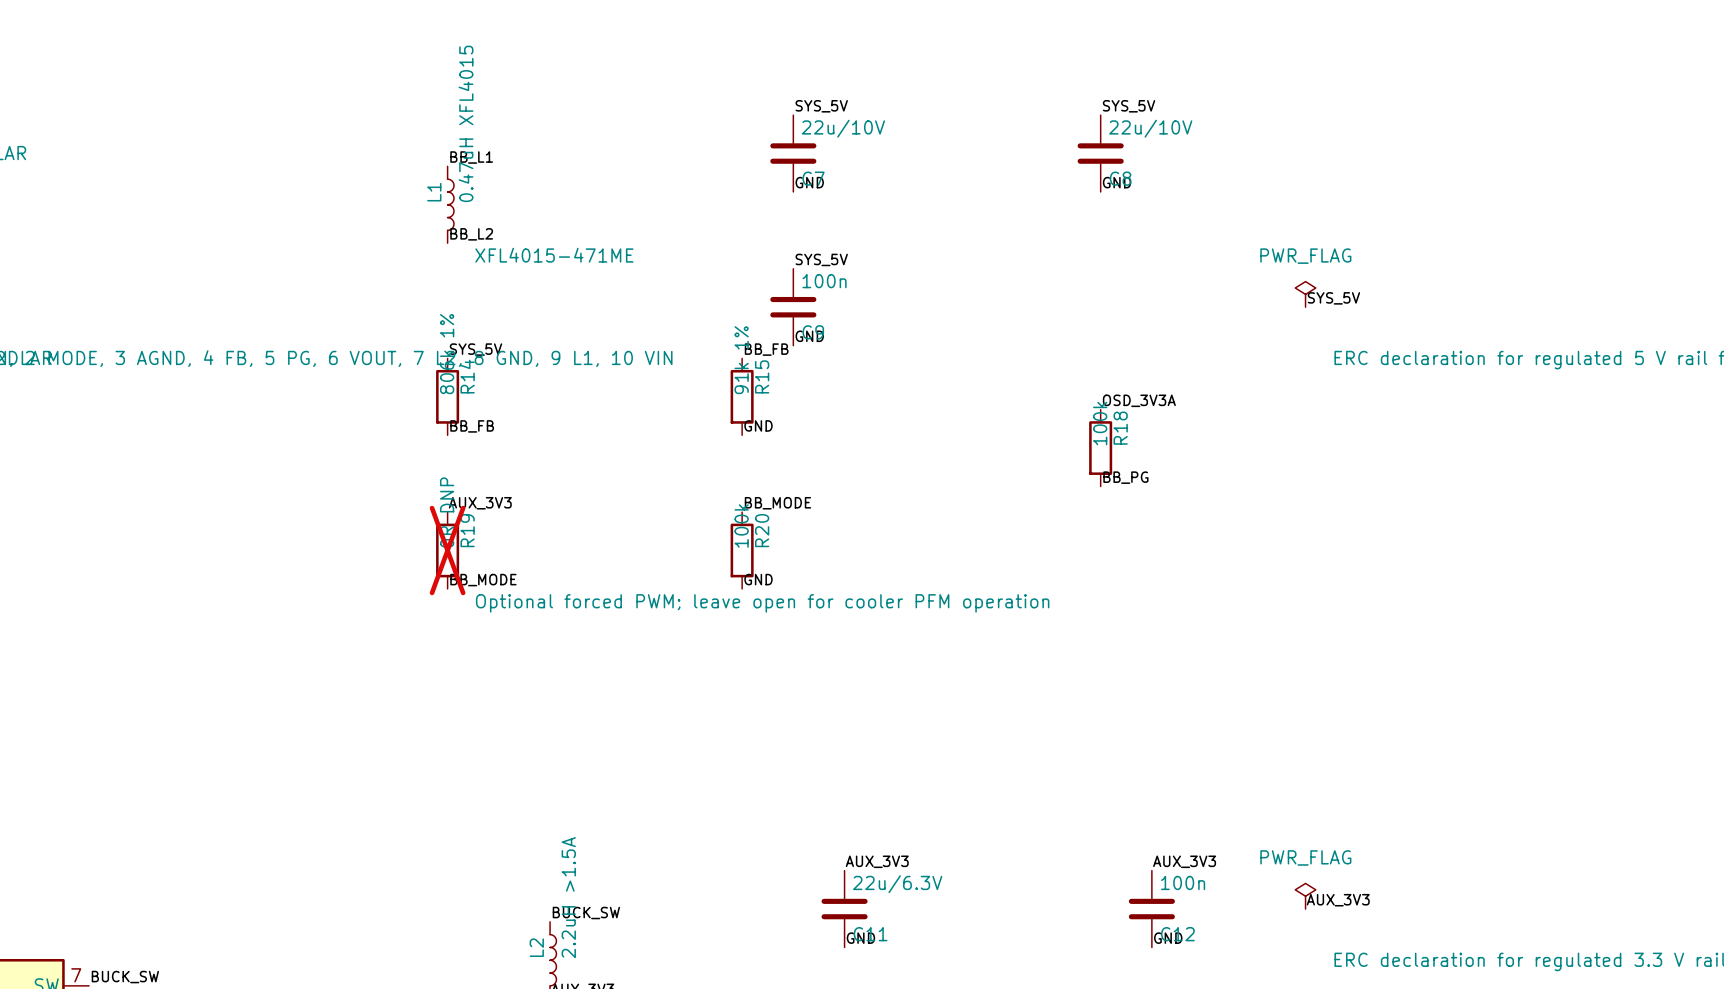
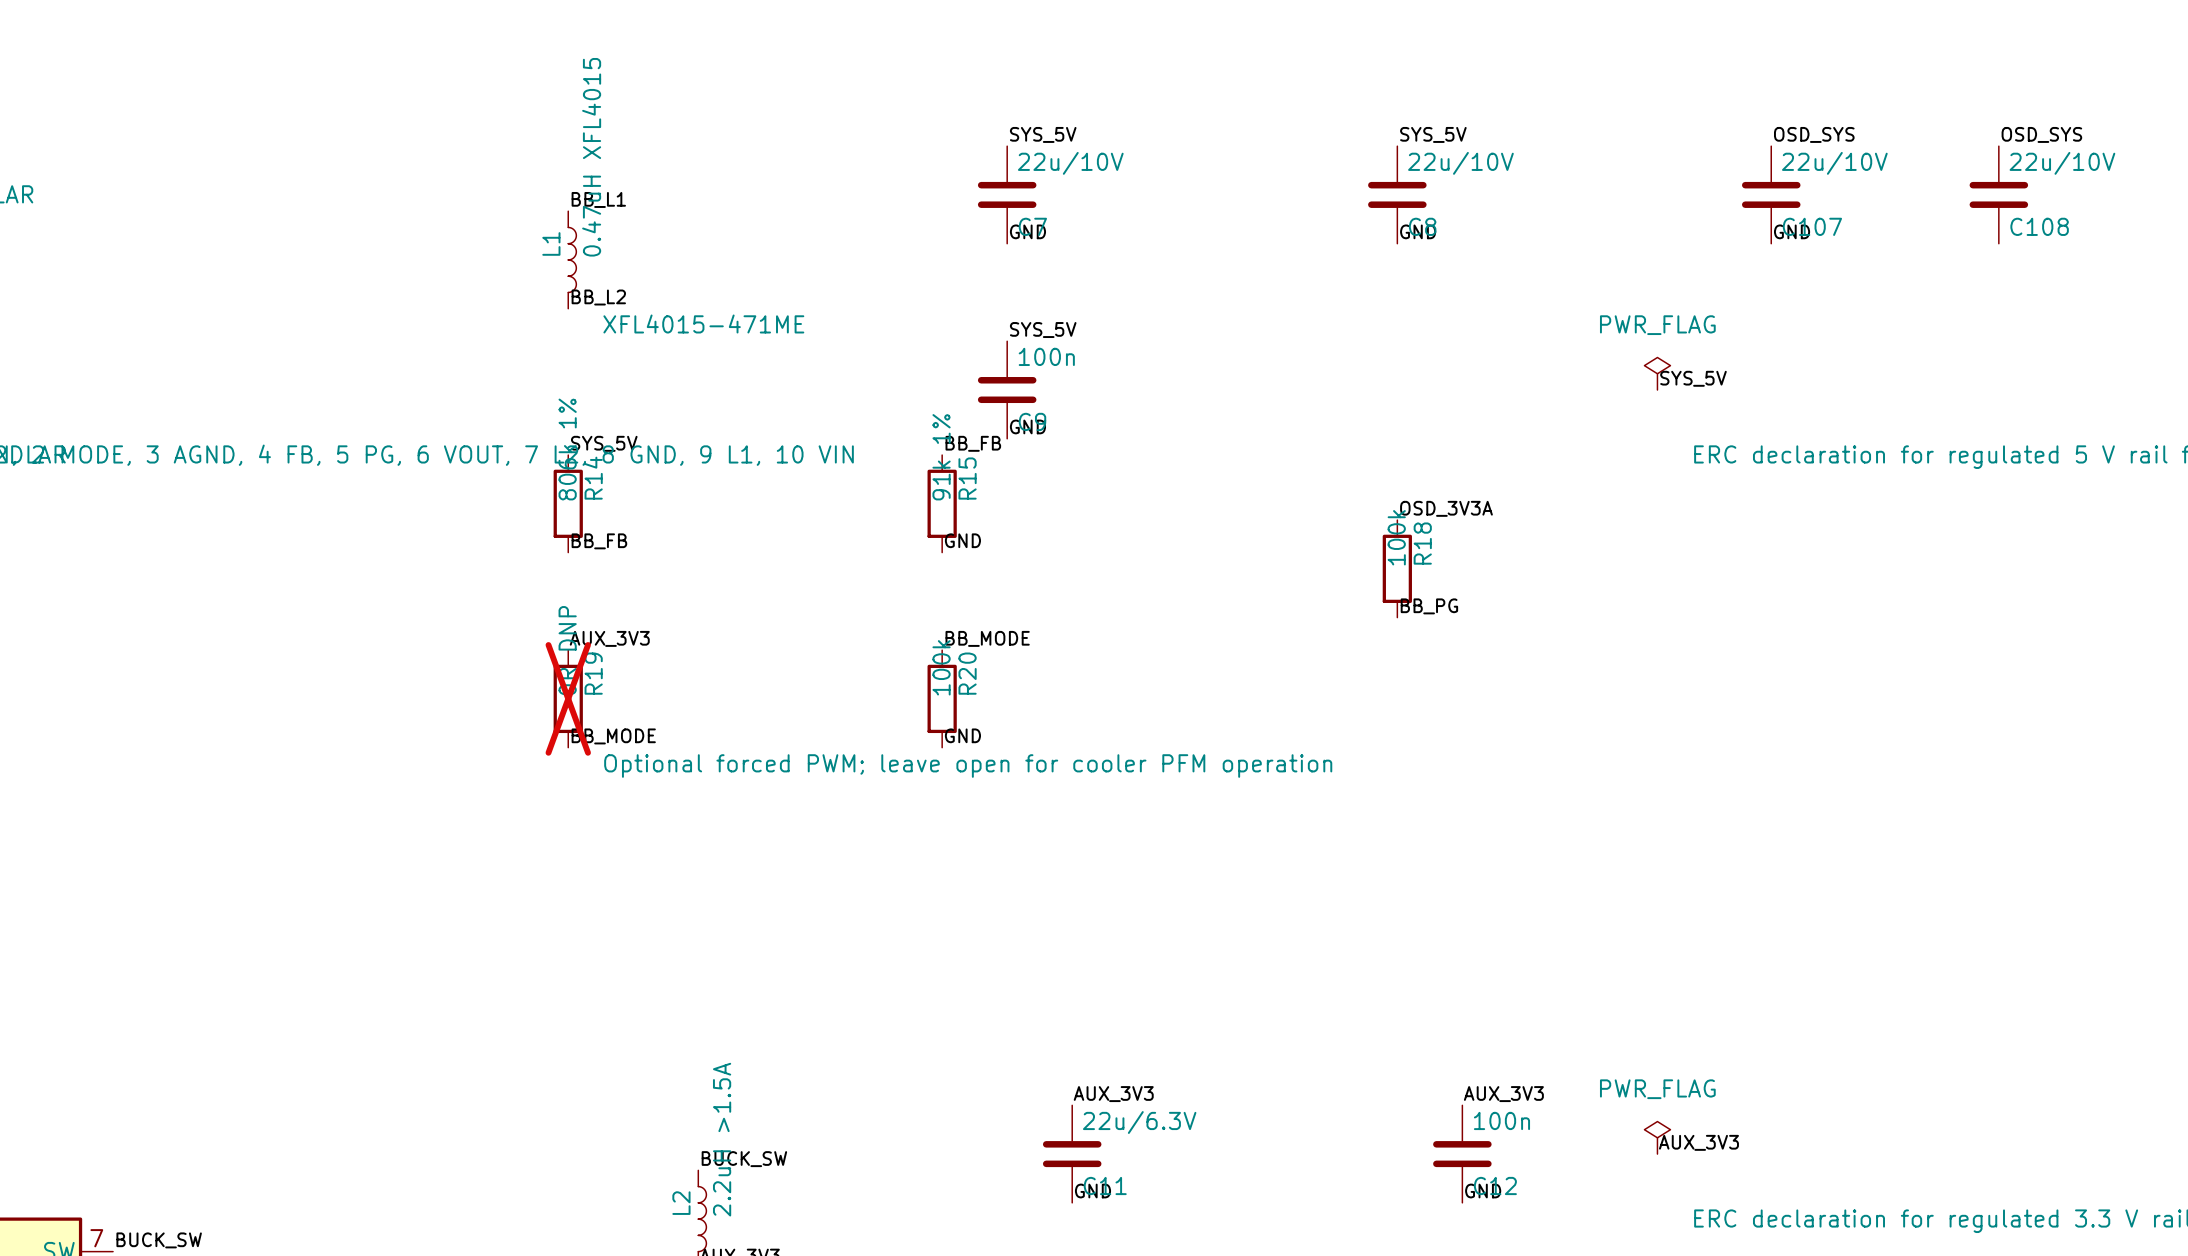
label: none -> OSD_SYS (1814, 134)
label: none -> OSD_SYS (2041, 134)
C107: none -> 22u/10V (1771, 194)
C108: none -> 22u/10V (1998, 194)
label: none -> GND (1792, 231)

